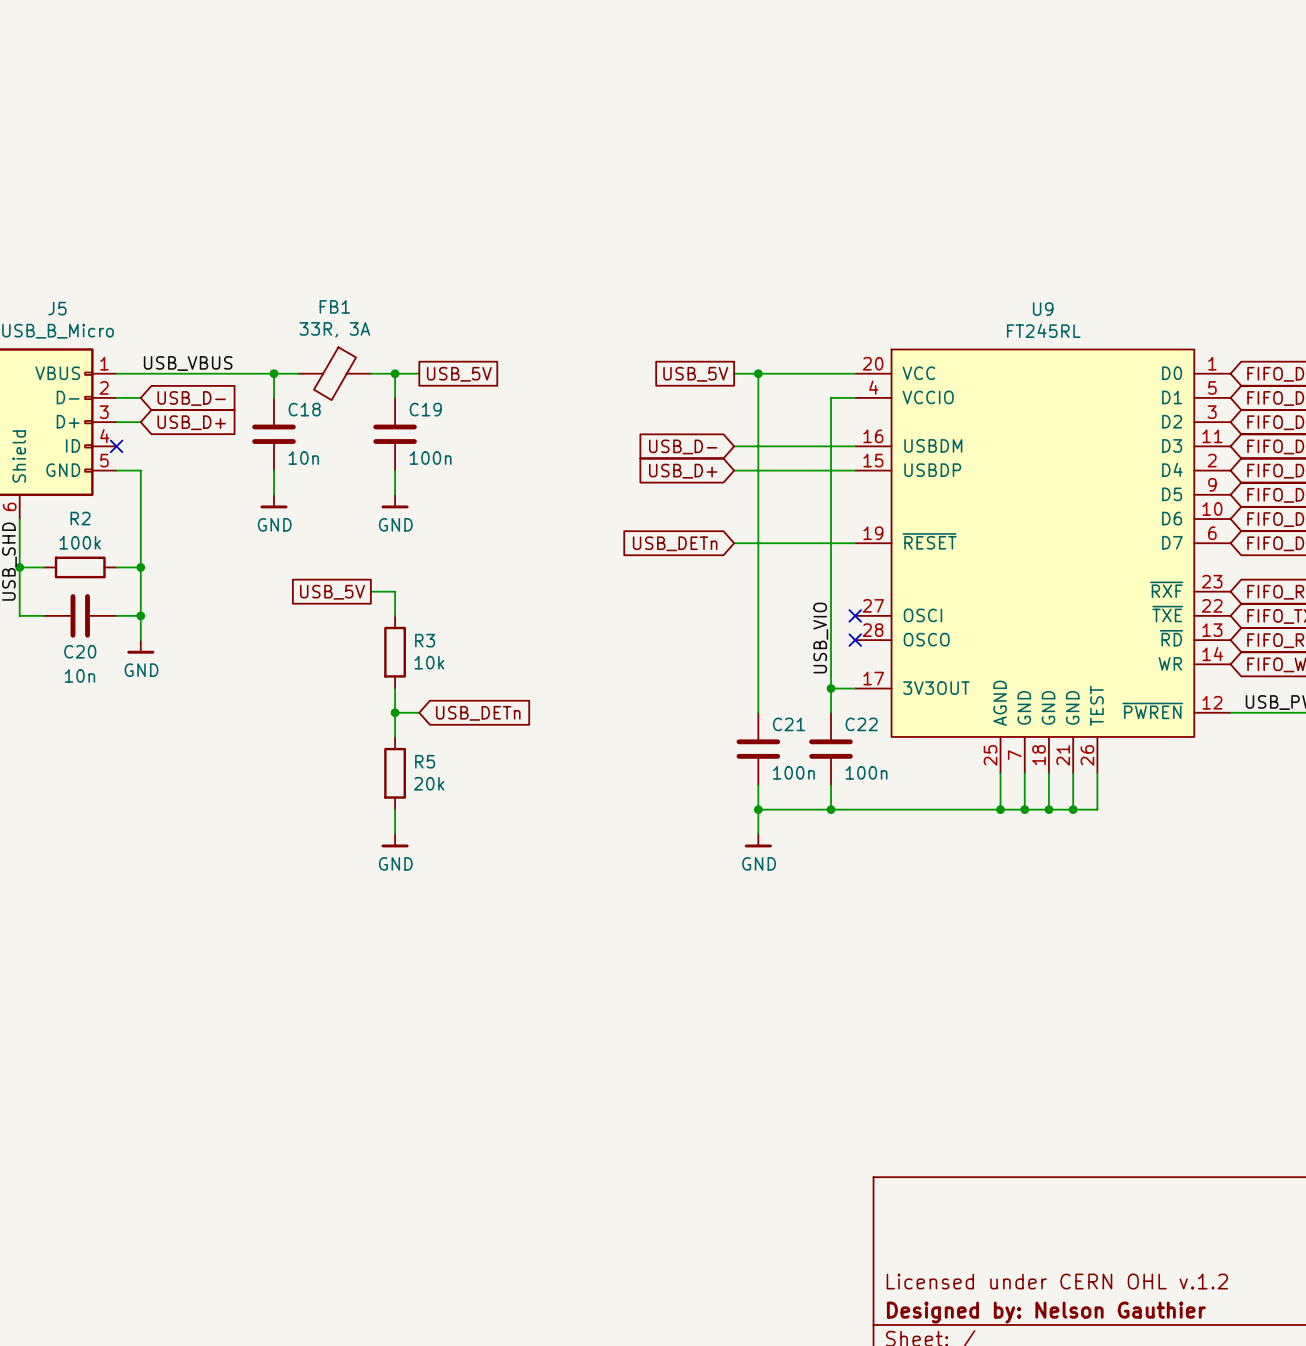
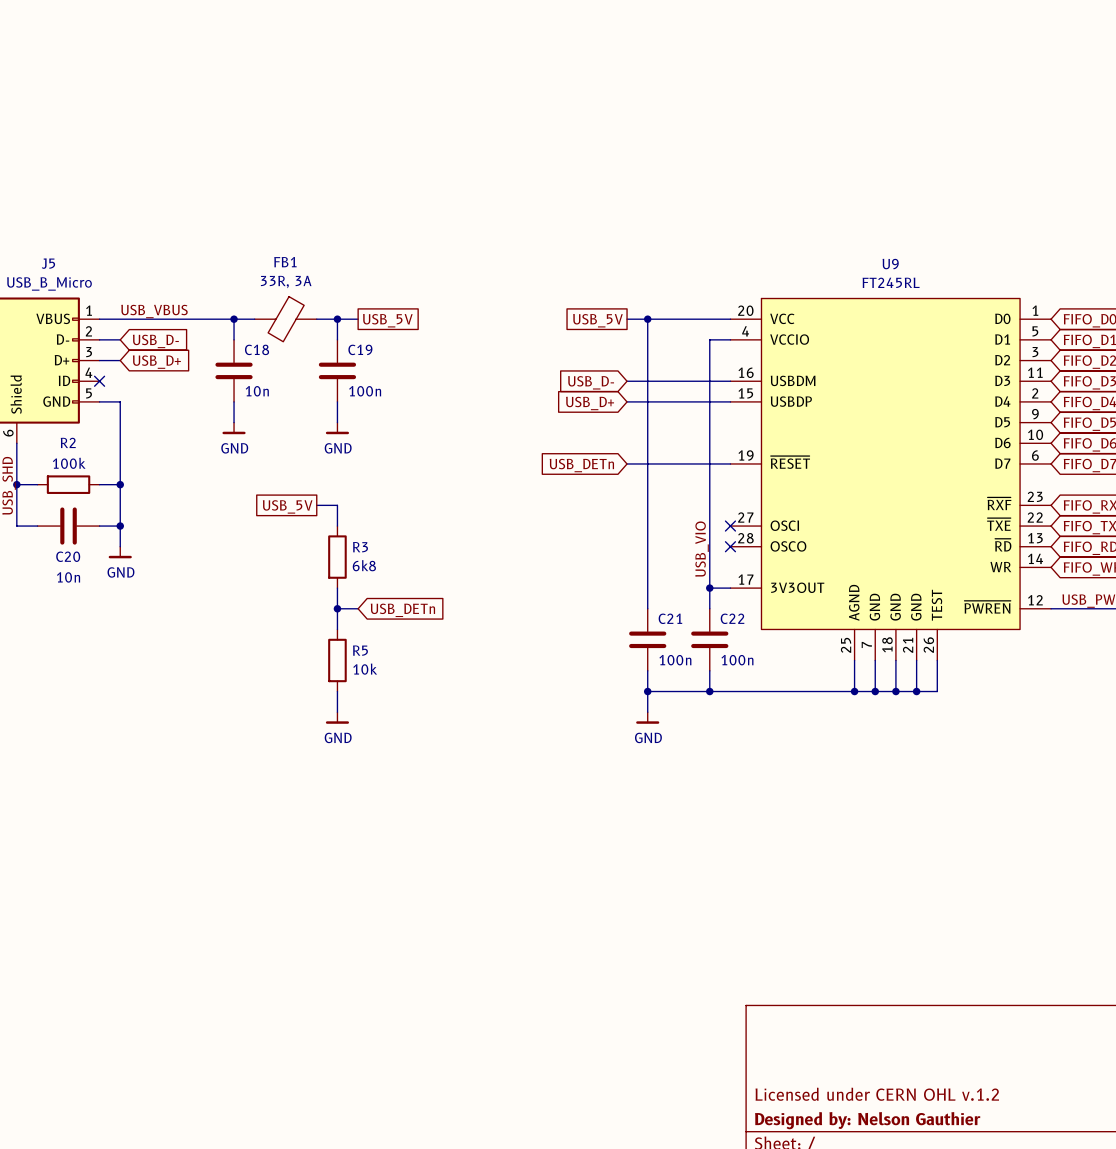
R3 value: 10k (429, 662) -> 6k8 (364, 565)
R5 value: 20k (429, 783) -> 10k (365, 669)

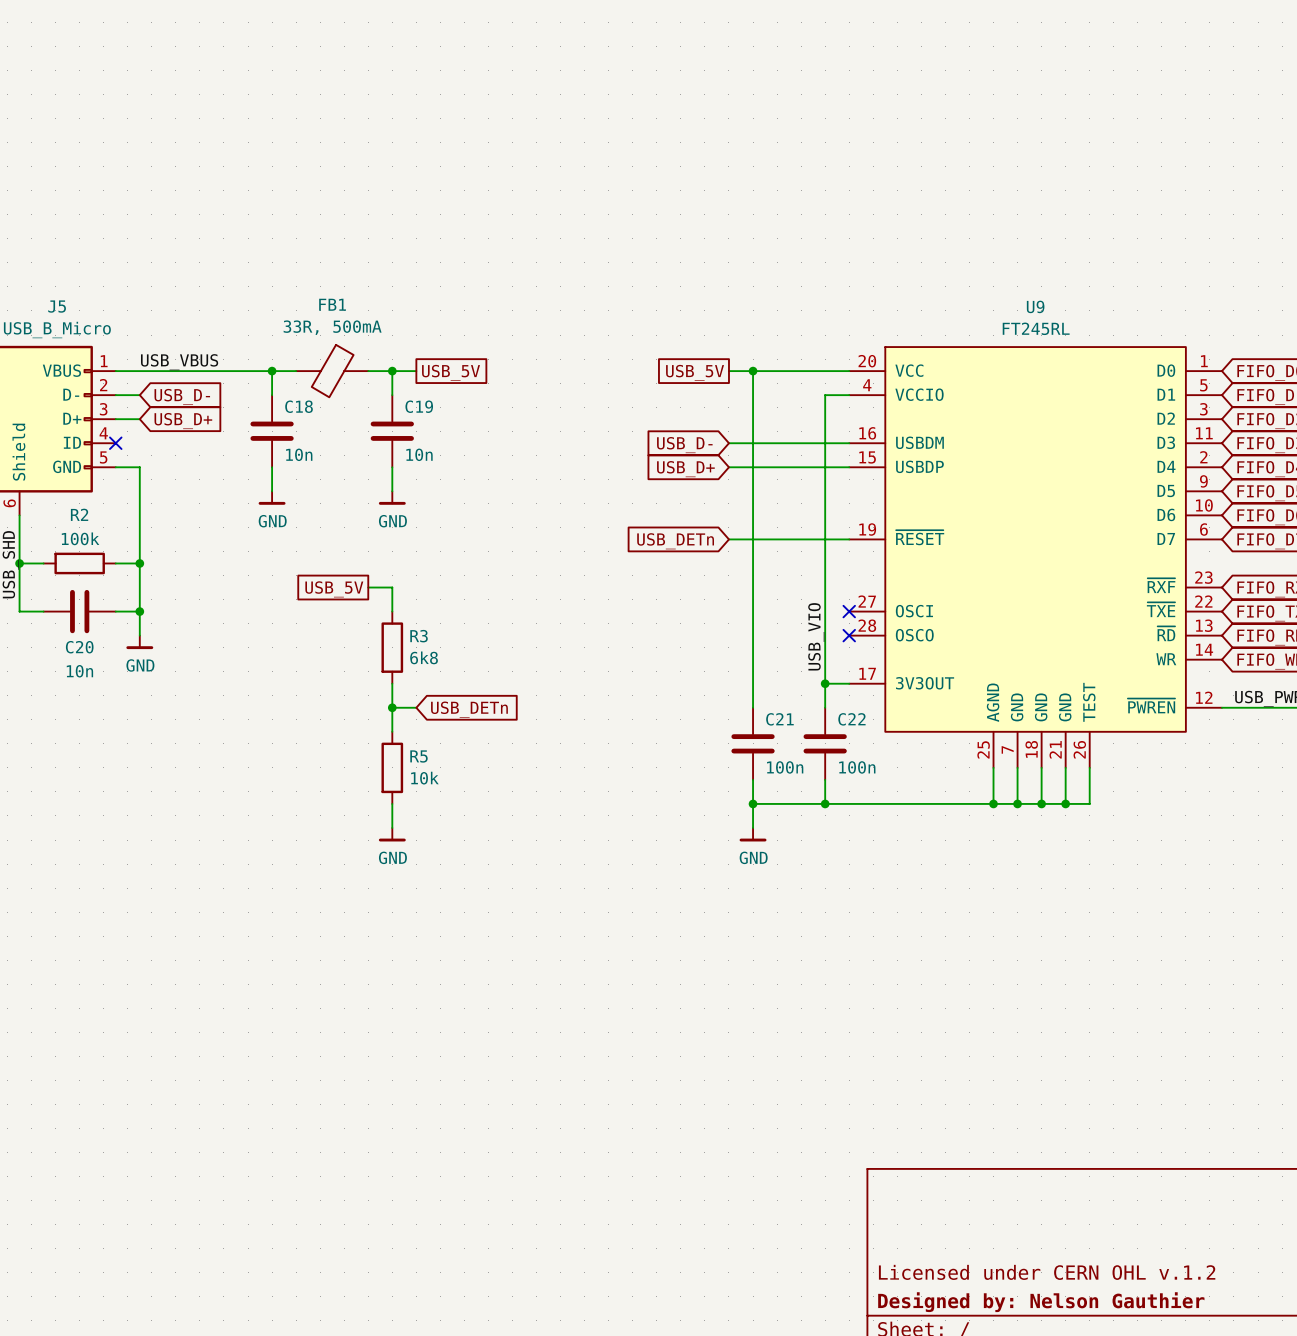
FB1 value: 33R, 3A (286, 281) -> 33R, 500mA (332, 327)
C19 value: 100n (365, 391) -> 10n (419, 454)

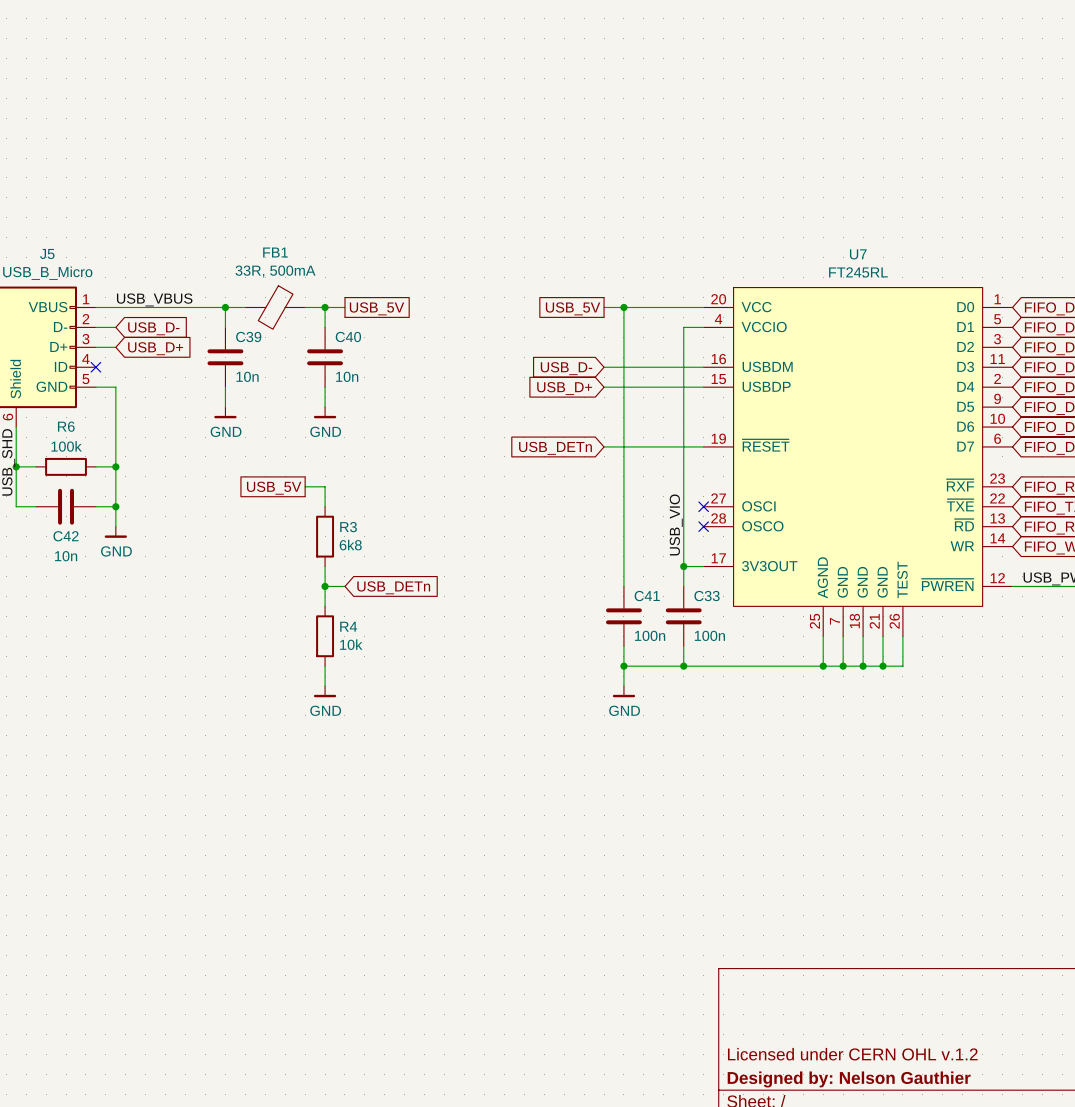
U9 name: U9 (1035, 306) -> U7 (858, 254)
C18 name: C18 (299, 406) -> C39 (248, 336)
C19 name: C19 (419, 406) -> C40 (348, 336)
R2 name: R2 (79, 514) -> R6 (66, 426)
C20 name: C20 (79, 647) -> C42 (66, 536)
C21 name: C21 (779, 719) -> C41 (647, 596)
C22 name: C22 (851, 719) -> C33 (707, 596)
R5 name: R5 (418, 756) -> R4 (348, 626)

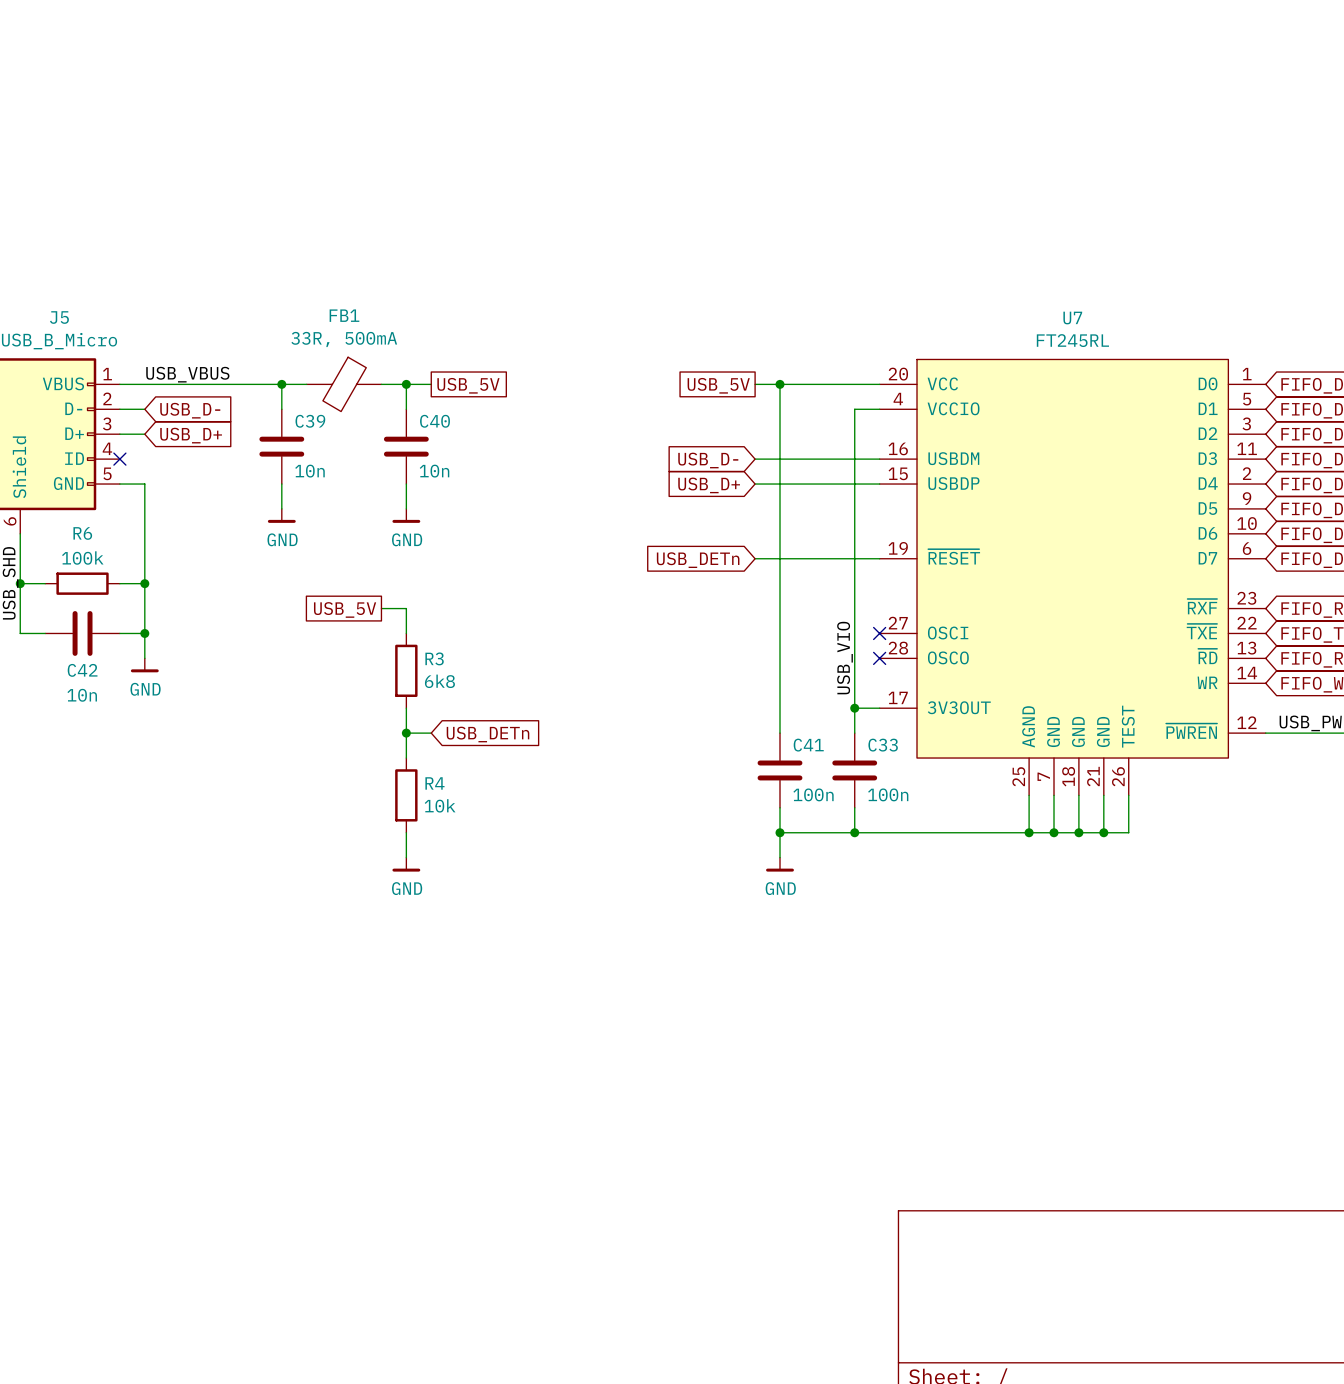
title block: Licensed under CERN OHL v.1.2 (852, 1054) -> none
title block: Designed by: Nelson Gauthier (849, 1079) -> none

